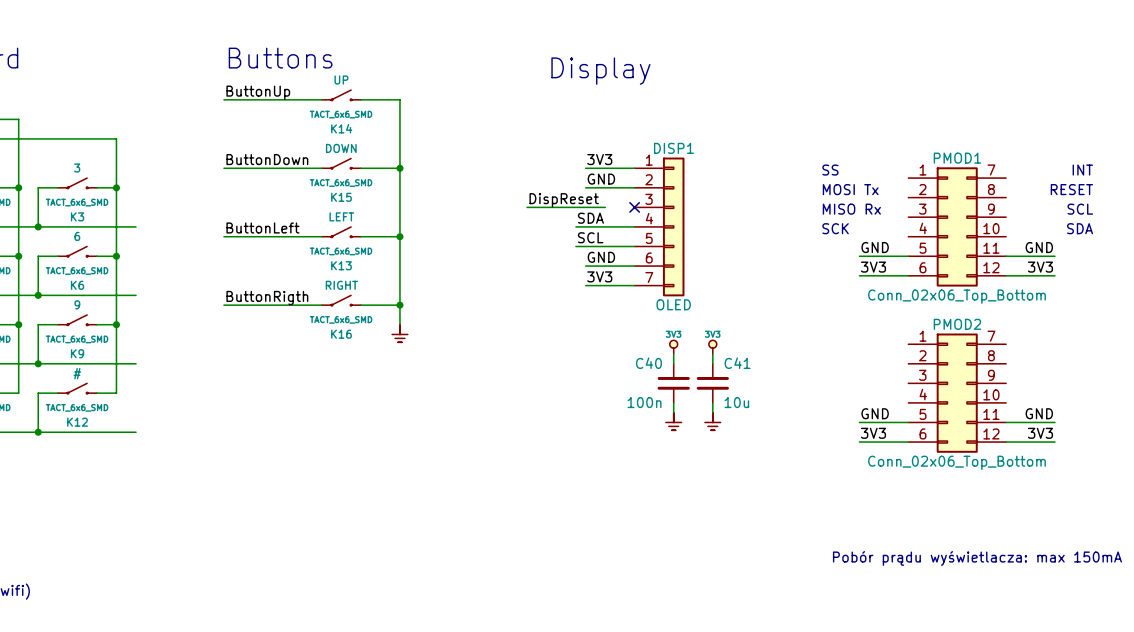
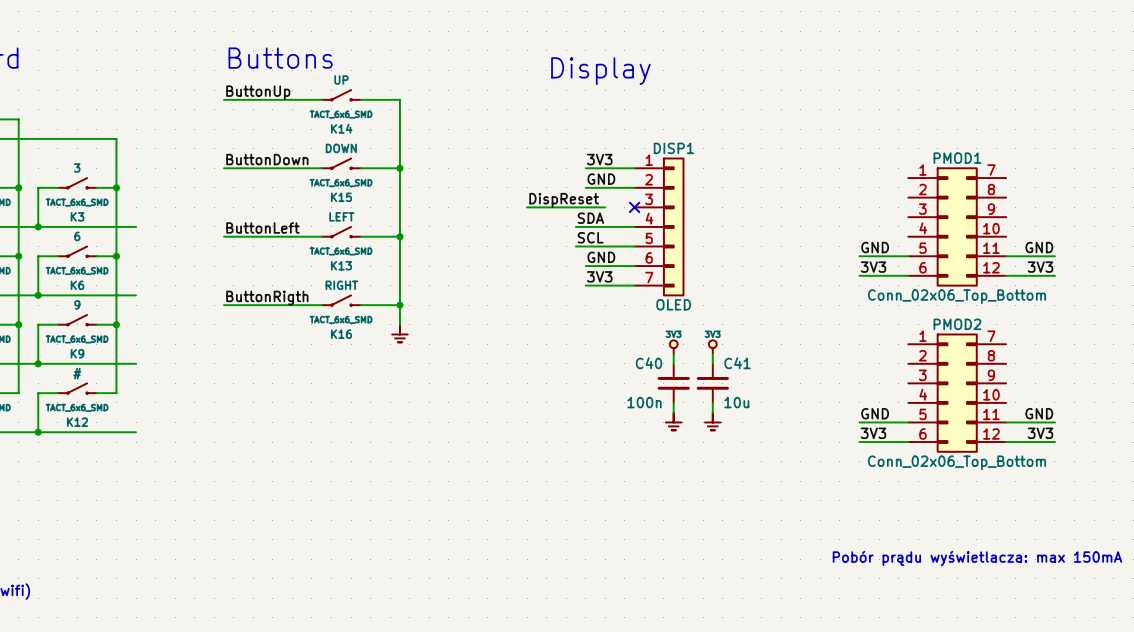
text: SS (830, 170) -> none
text: INT (1082, 170) -> none
text: MOSI Tx (850, 189) -> none
text: RESET (1071, 189) -> none
text: MISO Rx (851, 209) -> none
text: SCL (1080, 209) -> none
text: SCK (835, 228) -> none
text: SDA (1080, 228) -> none

